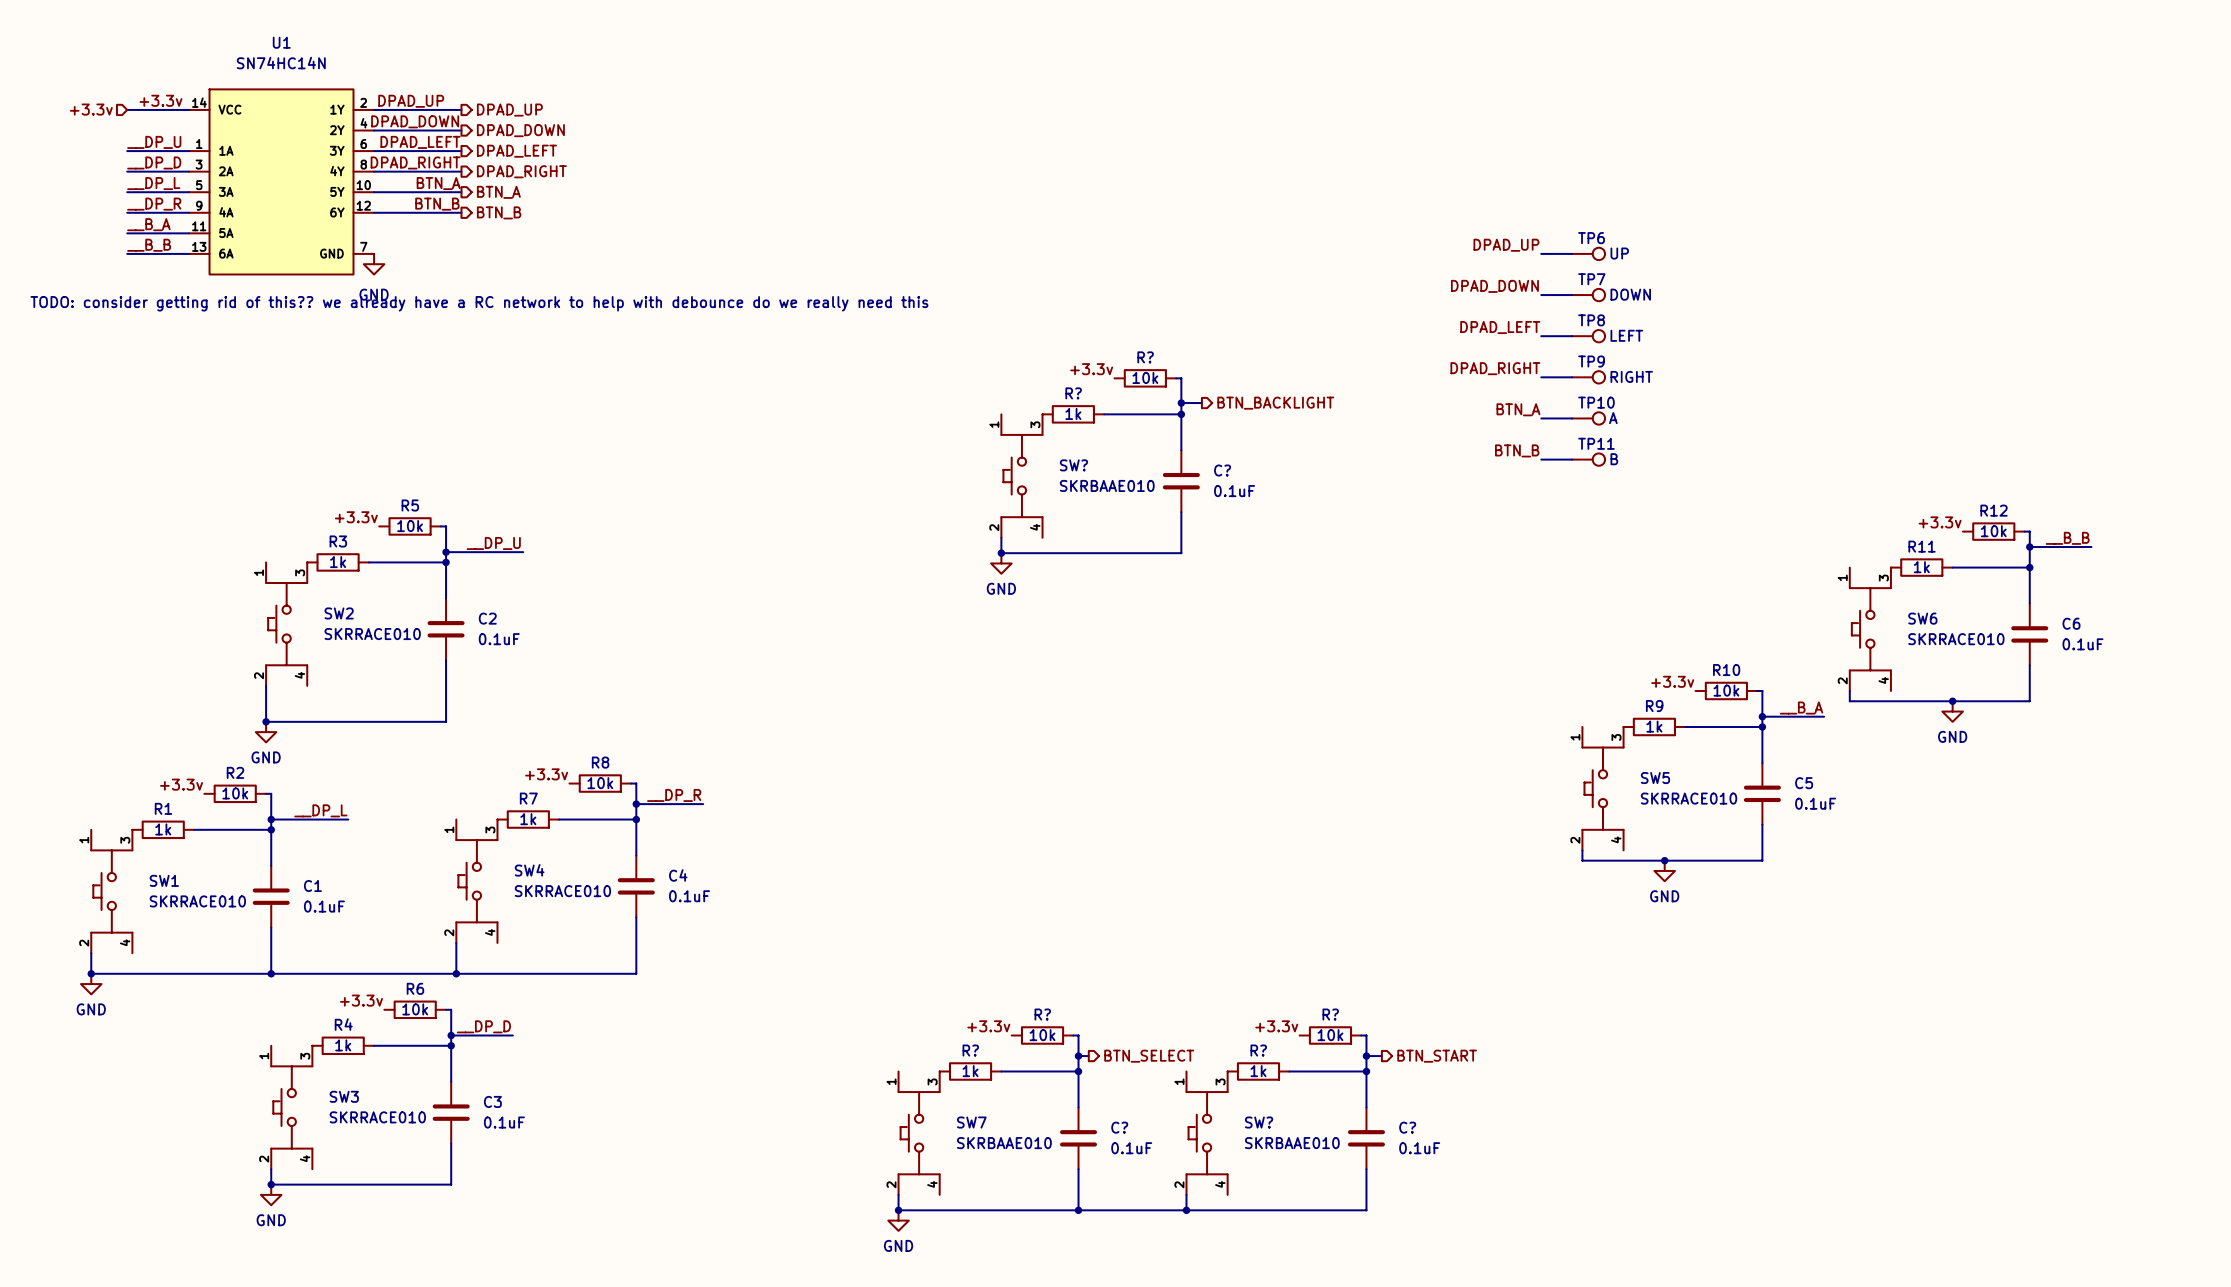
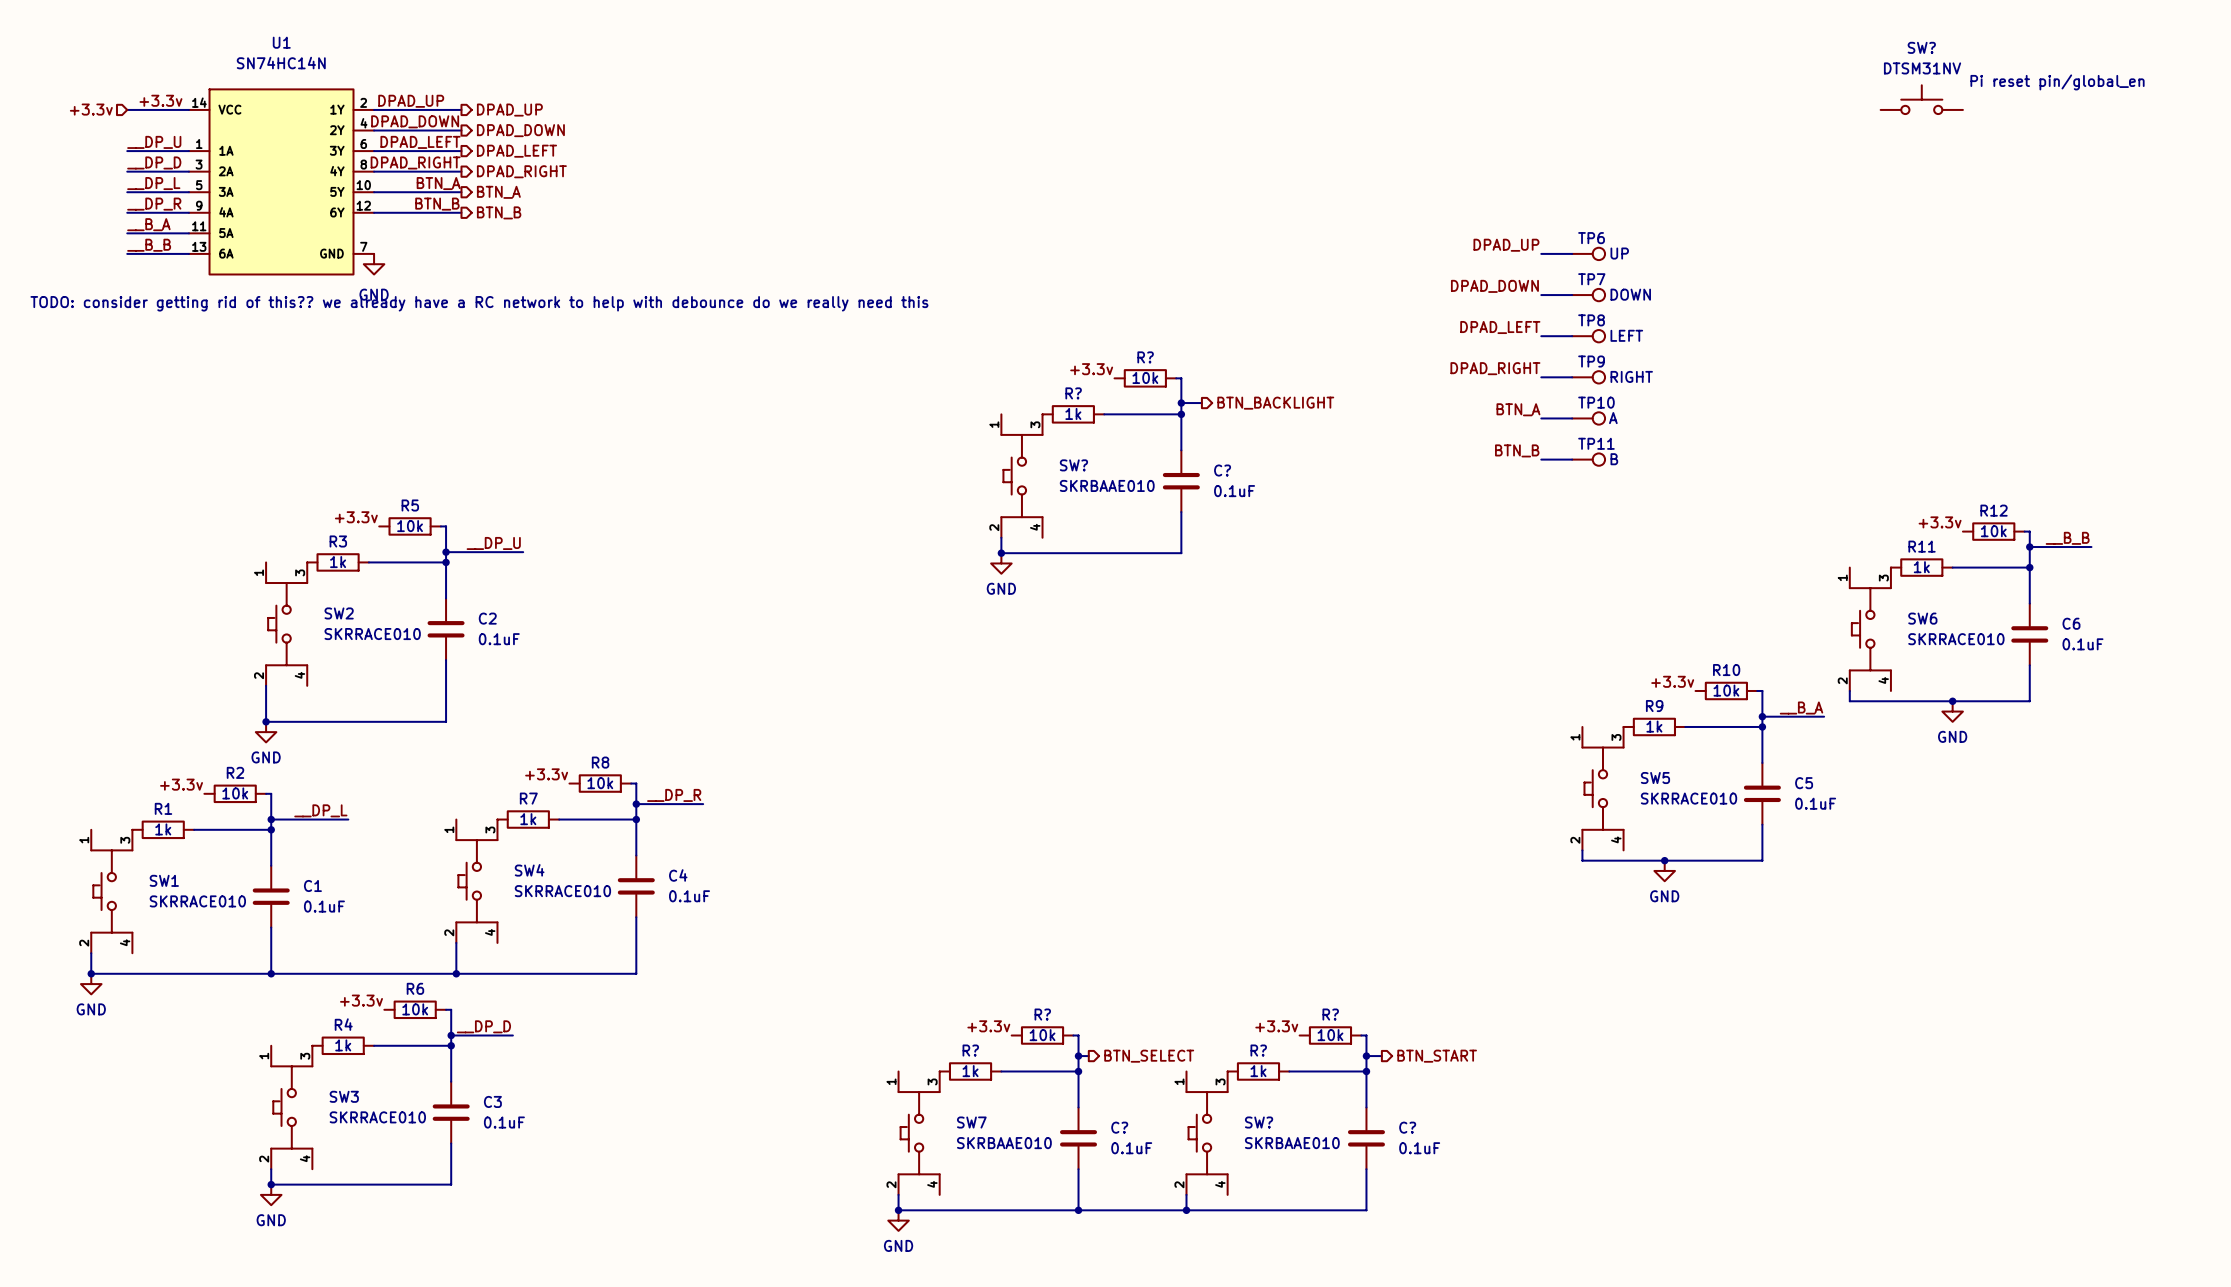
text: none -> Pi reset pin/global_en (2057, 82)
SW?: none -> DTSM31NV (1921, 99)

